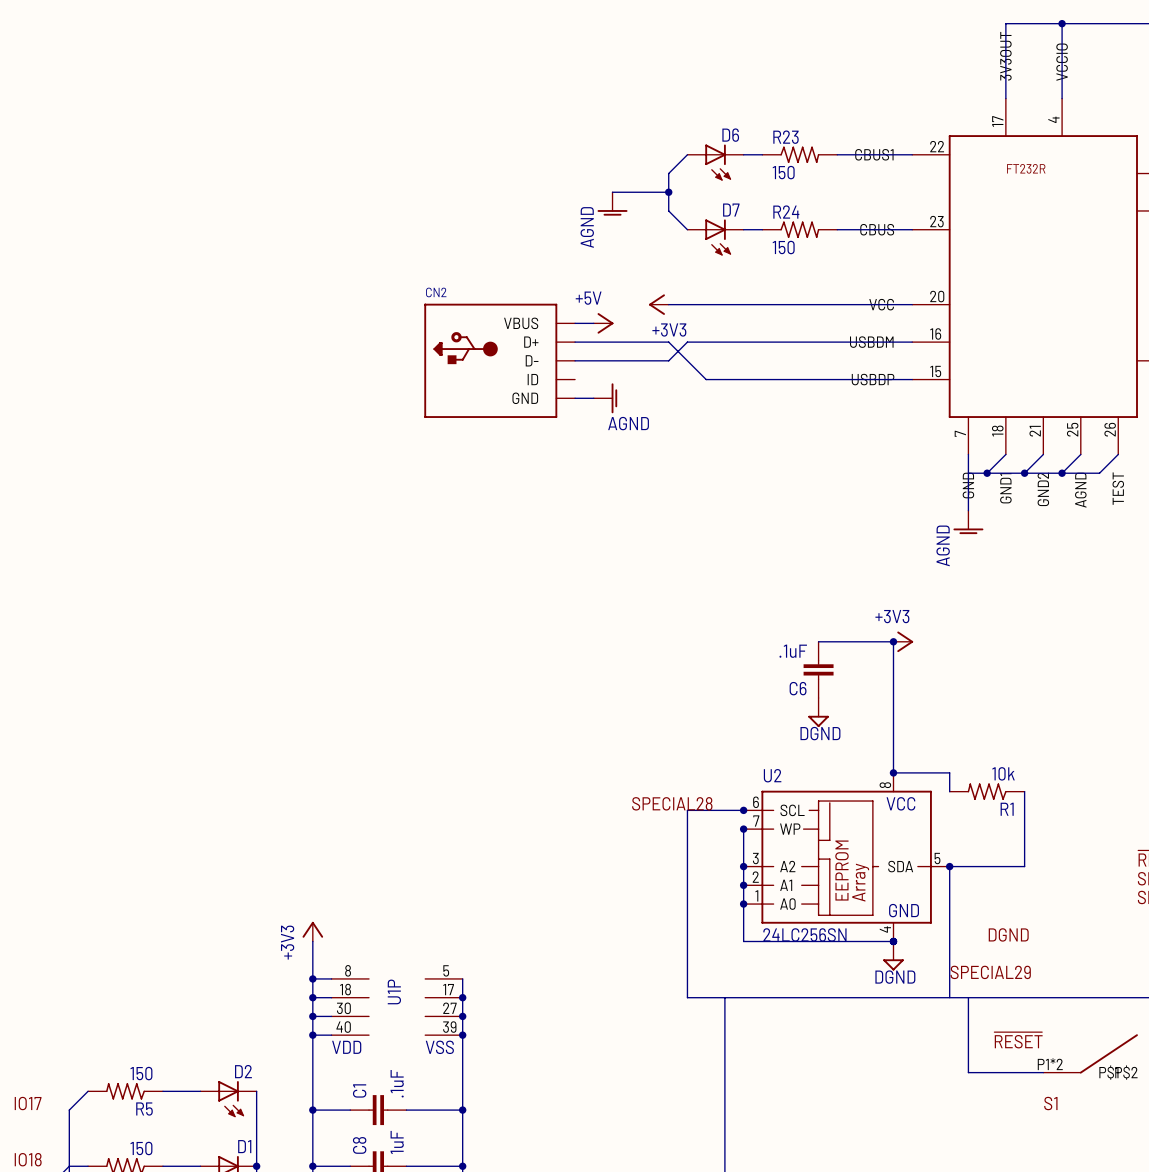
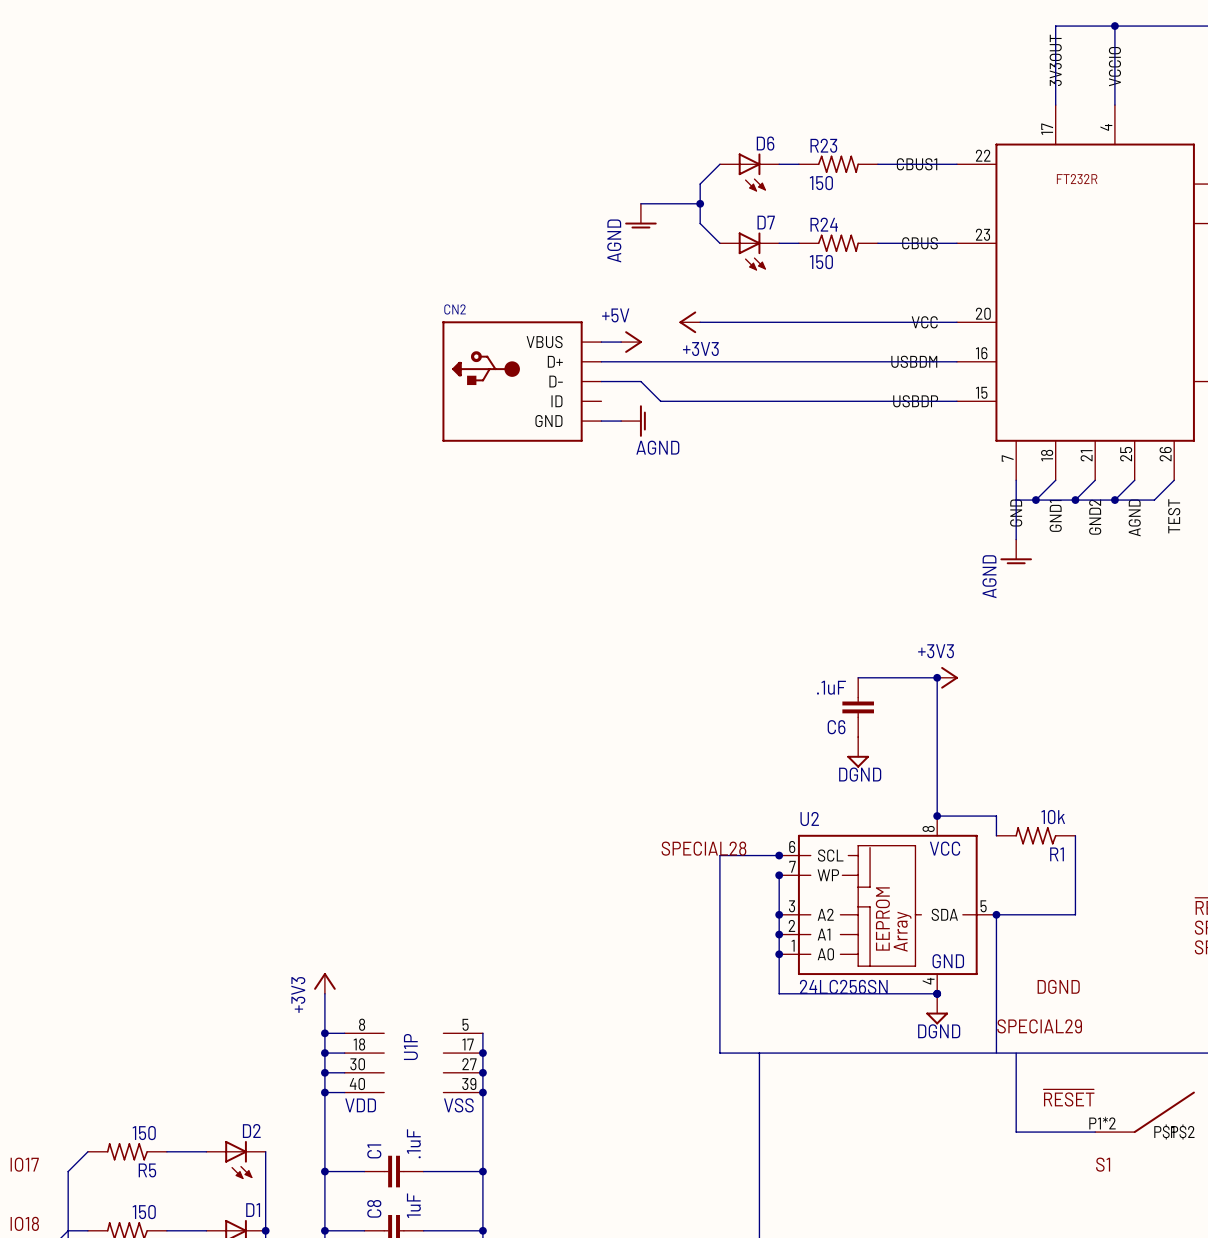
wire: (668, 342) (706, 379) -> (700, 361) (719, 361)
wire: (687, 342) (668, 360) (612, 360) -> (739, 401) (660, 401) (640, 381)

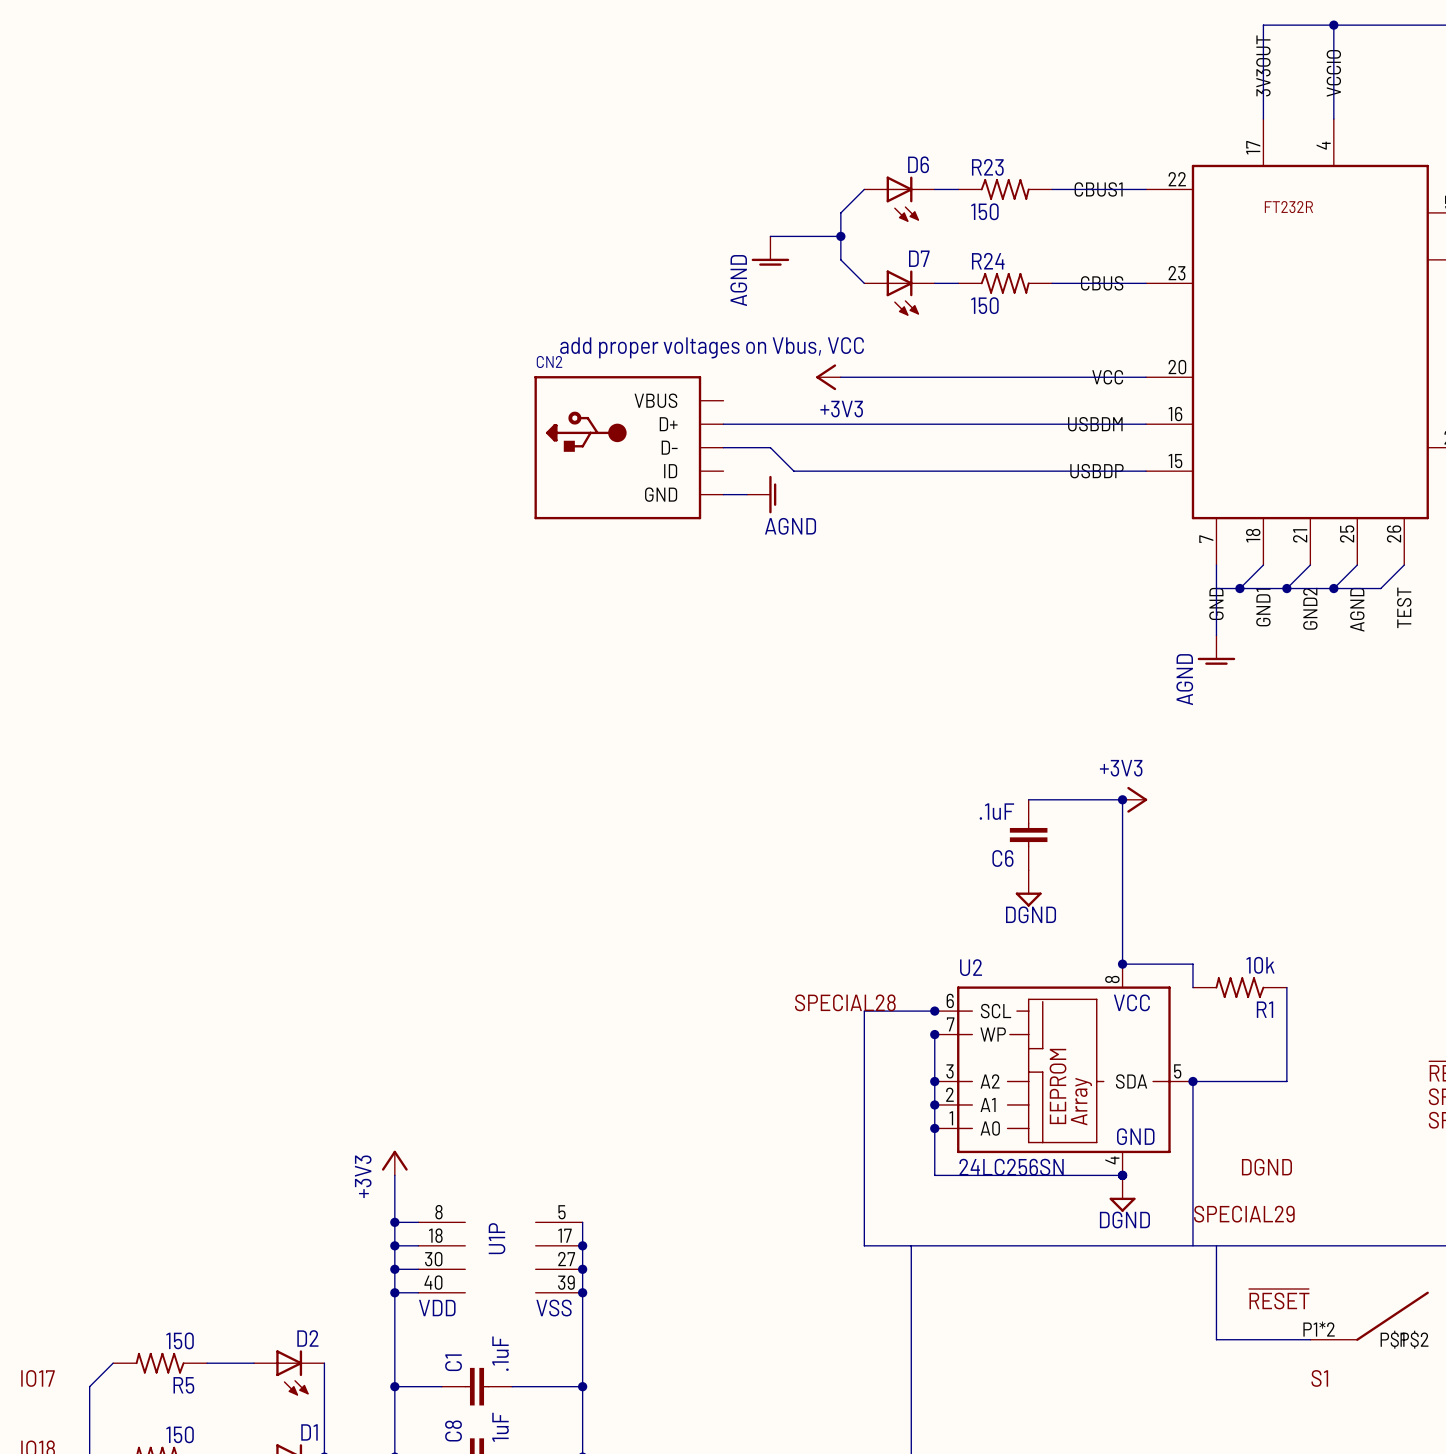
text: none -> add proper voltages on Vbus, VCC (712, 347)
wire: (601, 342) (621, 342) -> none
power symbol: +5V (631, 342) -> none

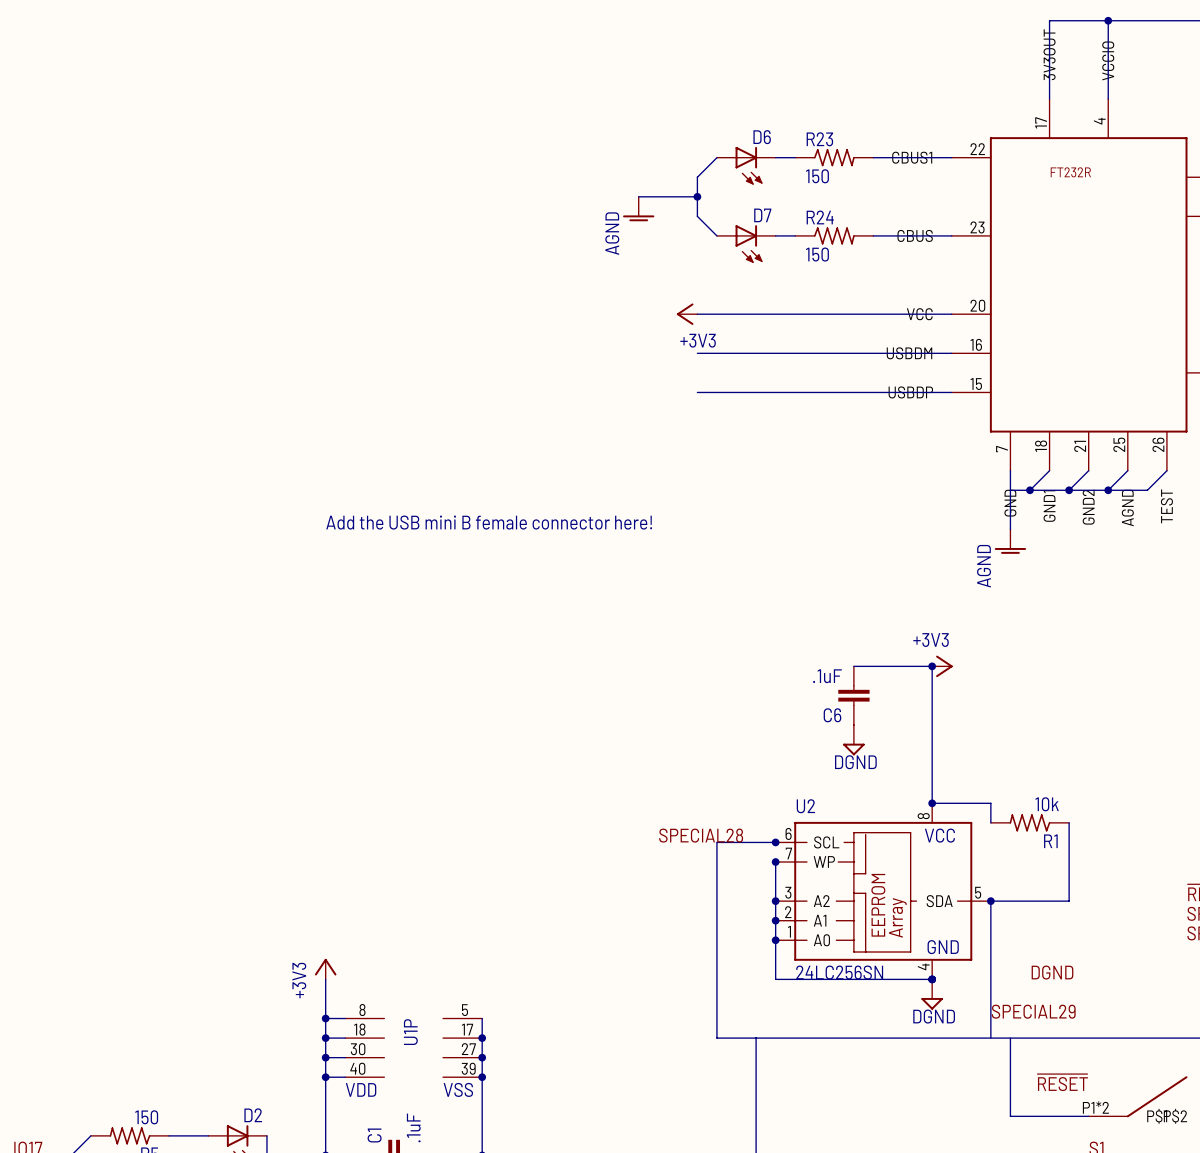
text: add proper voltages on Vbus, VCC (712, 347) -> none
wire: (723, 424) (840, 424) -> none
CN2: (628, 447) -> none
wire: (723, 447) (770, 447) (793, 471) (840, 471) -> none
wire: (723, 494) (746, 494) -> none
power symbol: AGND (761, 494) -> none
text: none -> Add the USB mini B female connector here! (489, 522)

